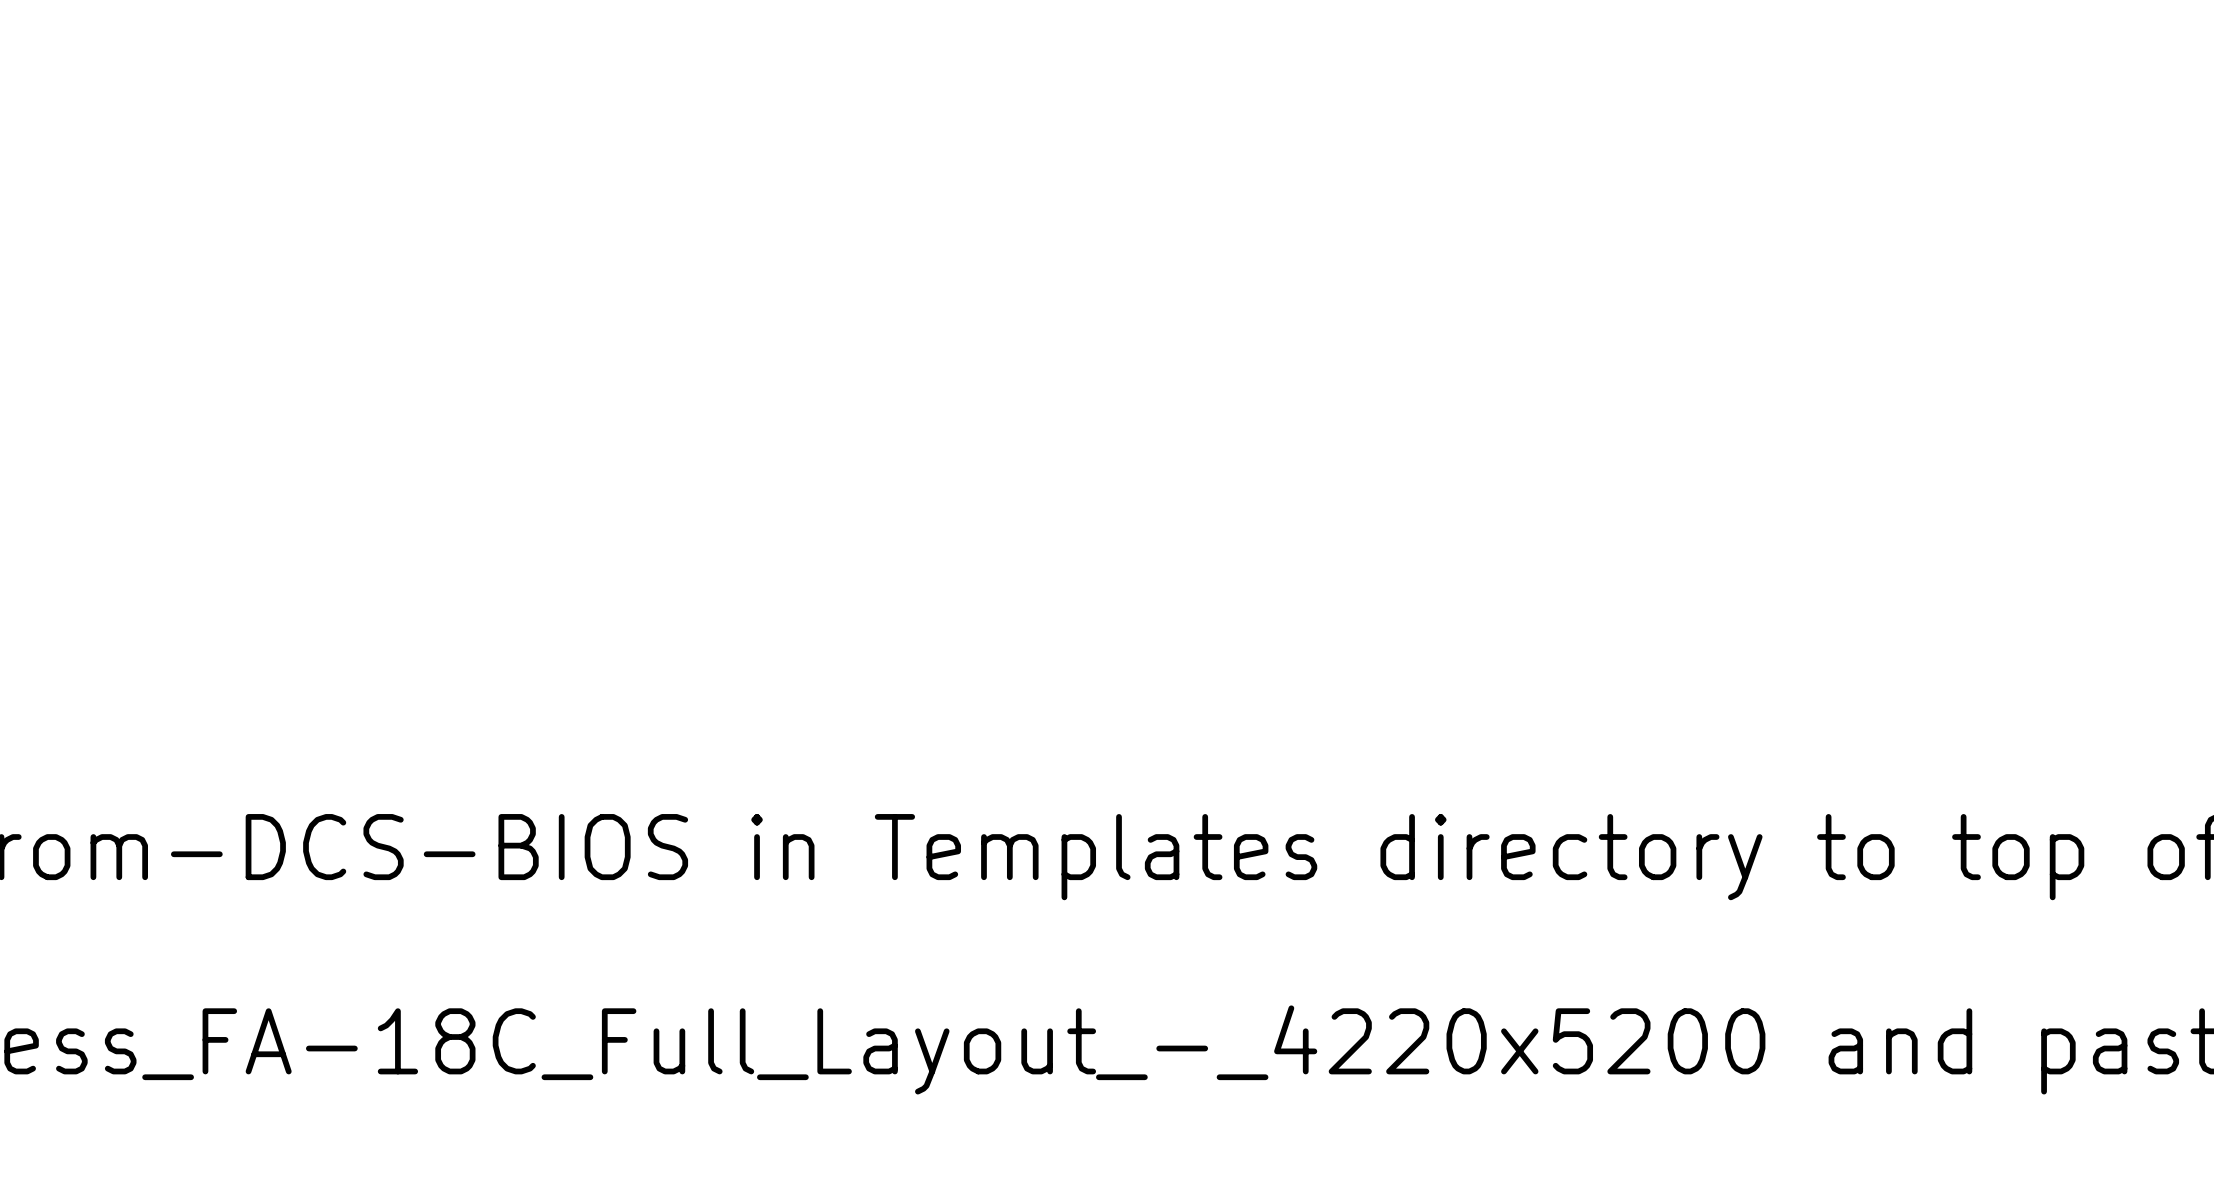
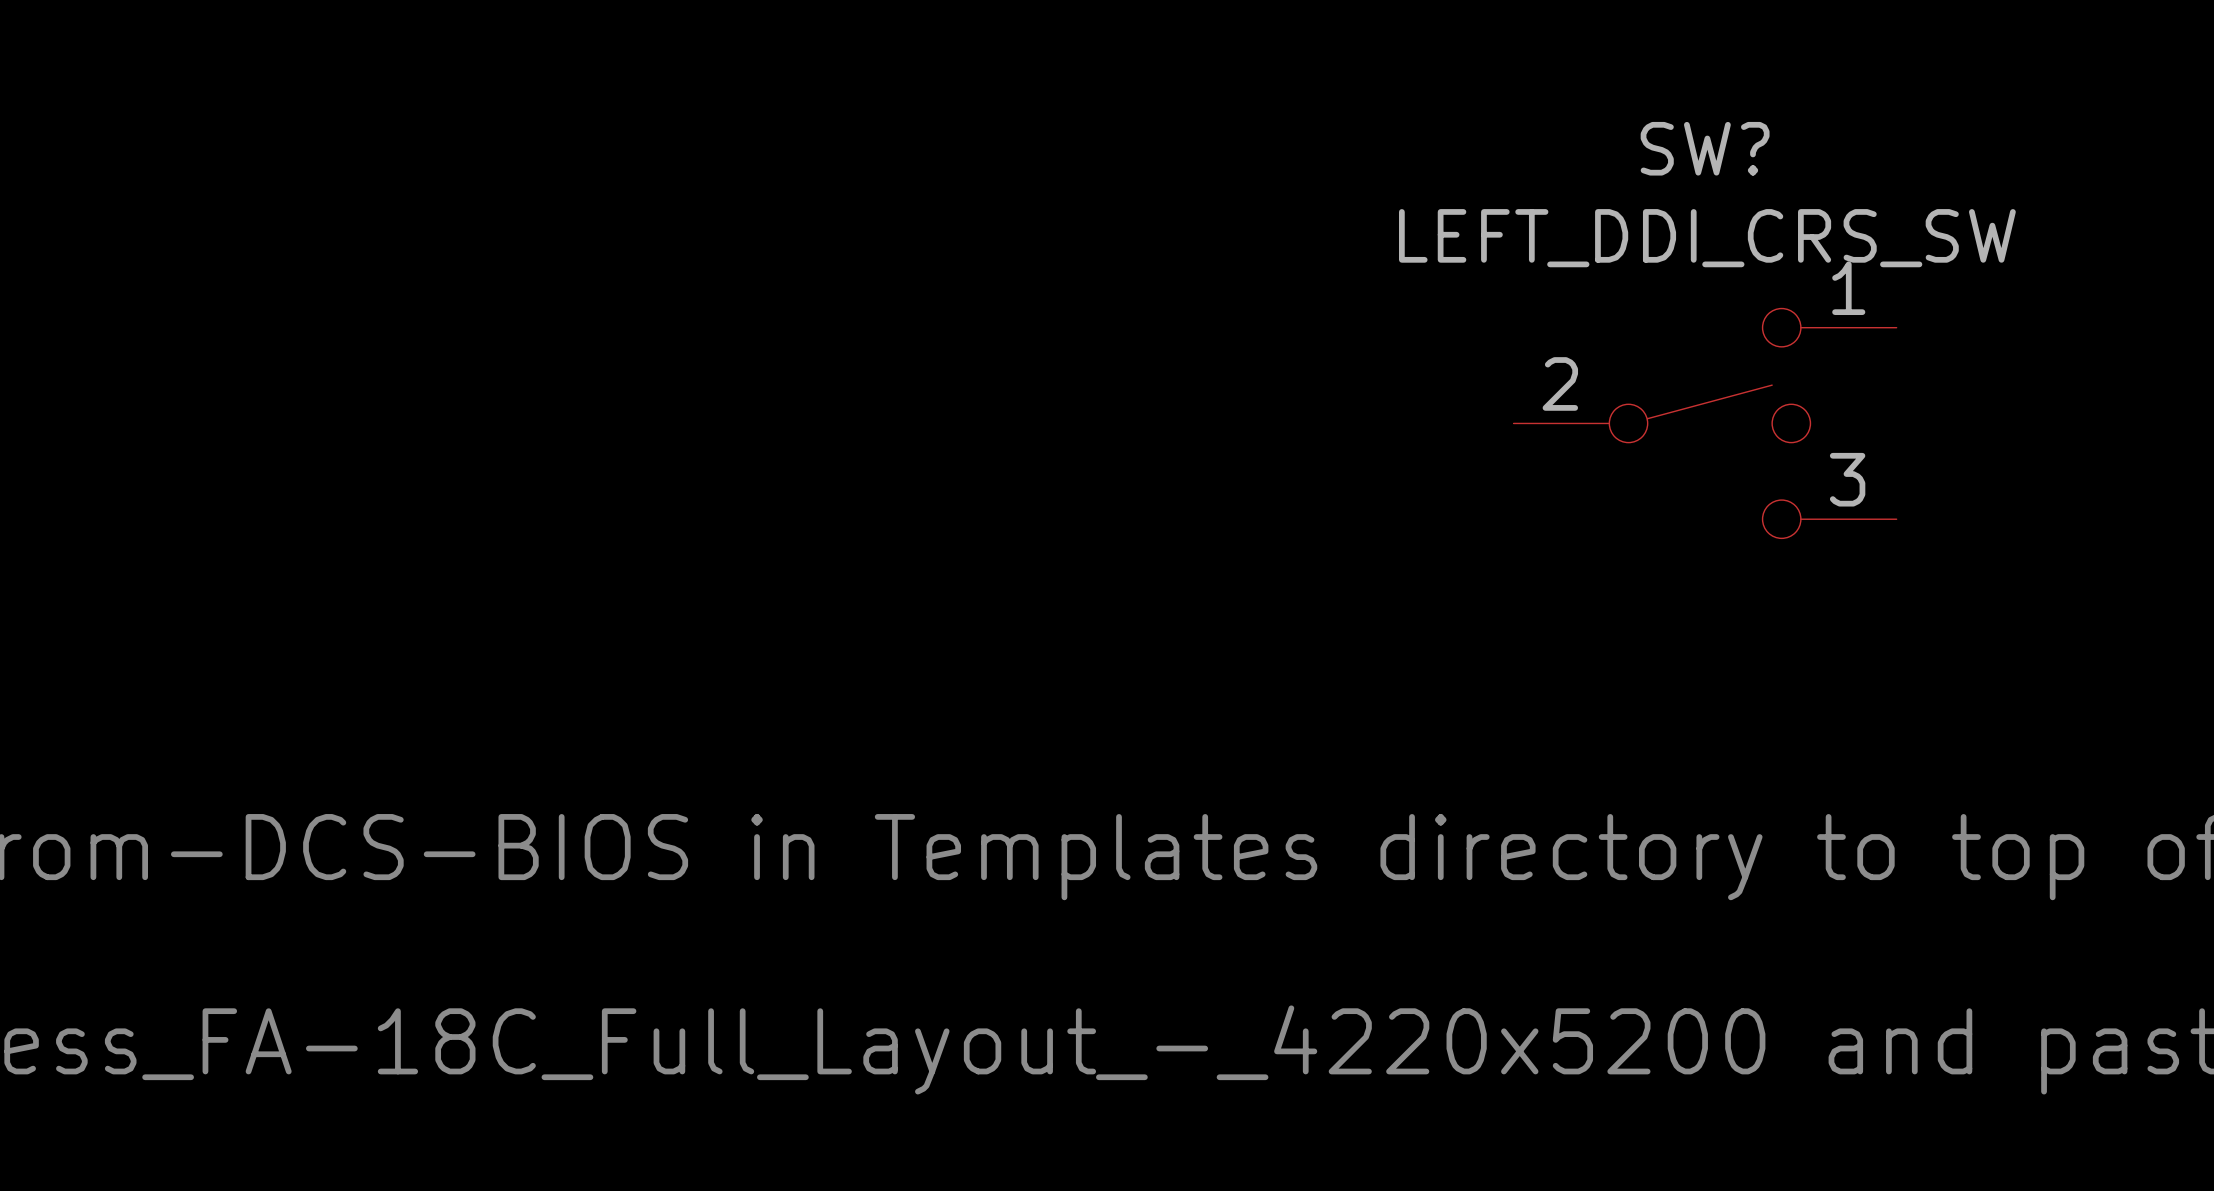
SW?: none -> LEFT_DDI_CRS_SW (1705, 423)

